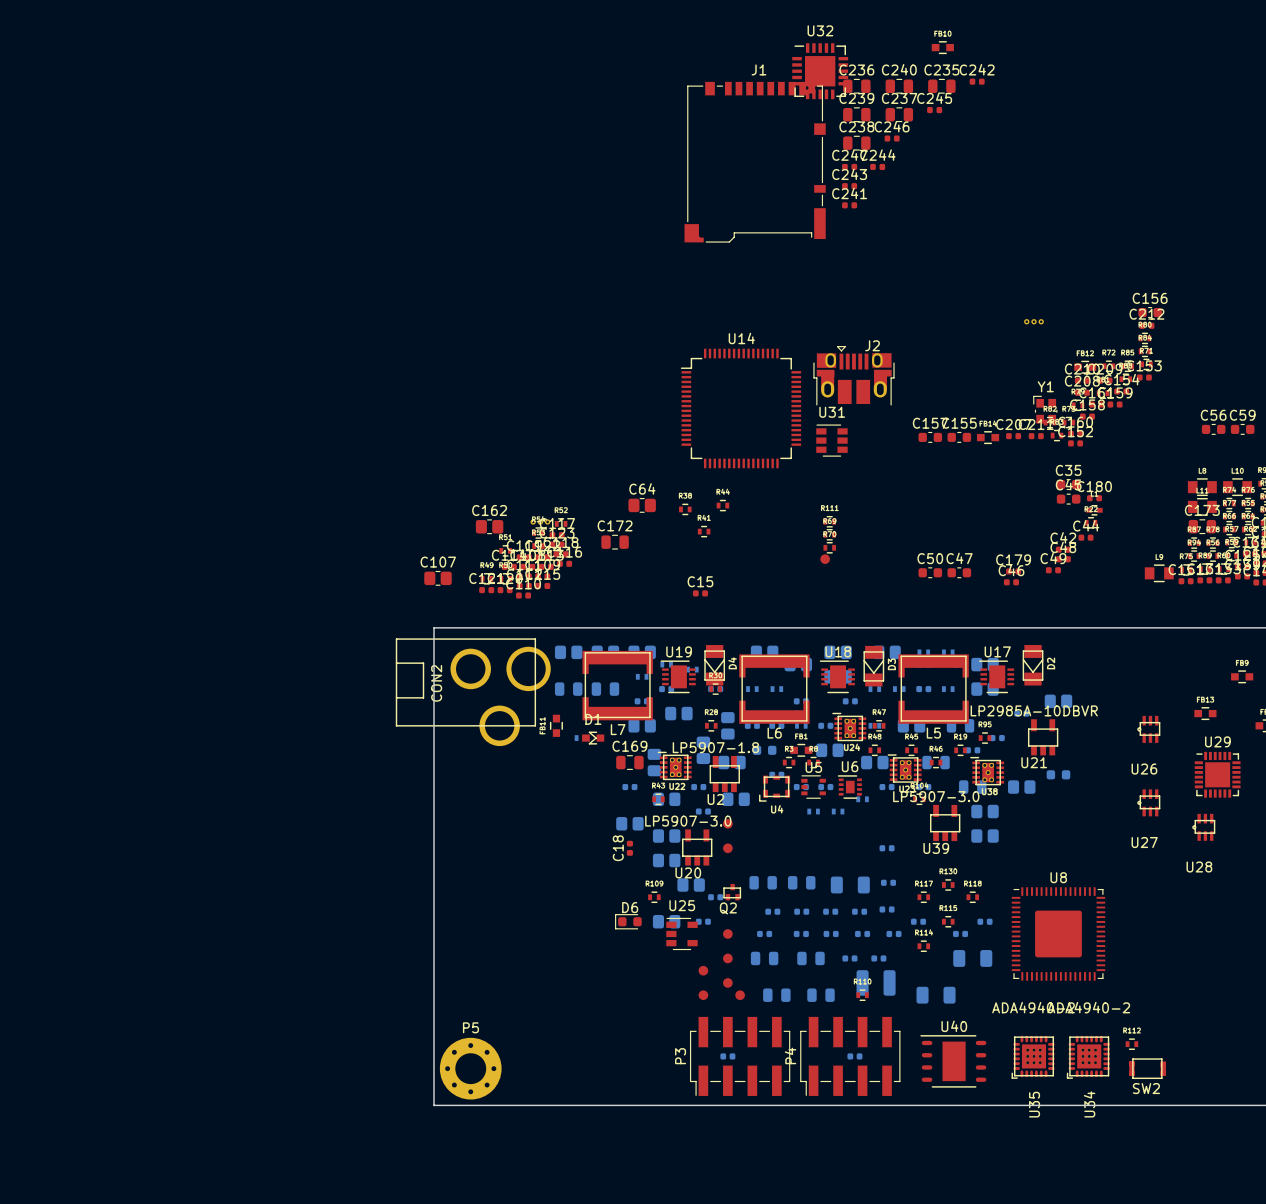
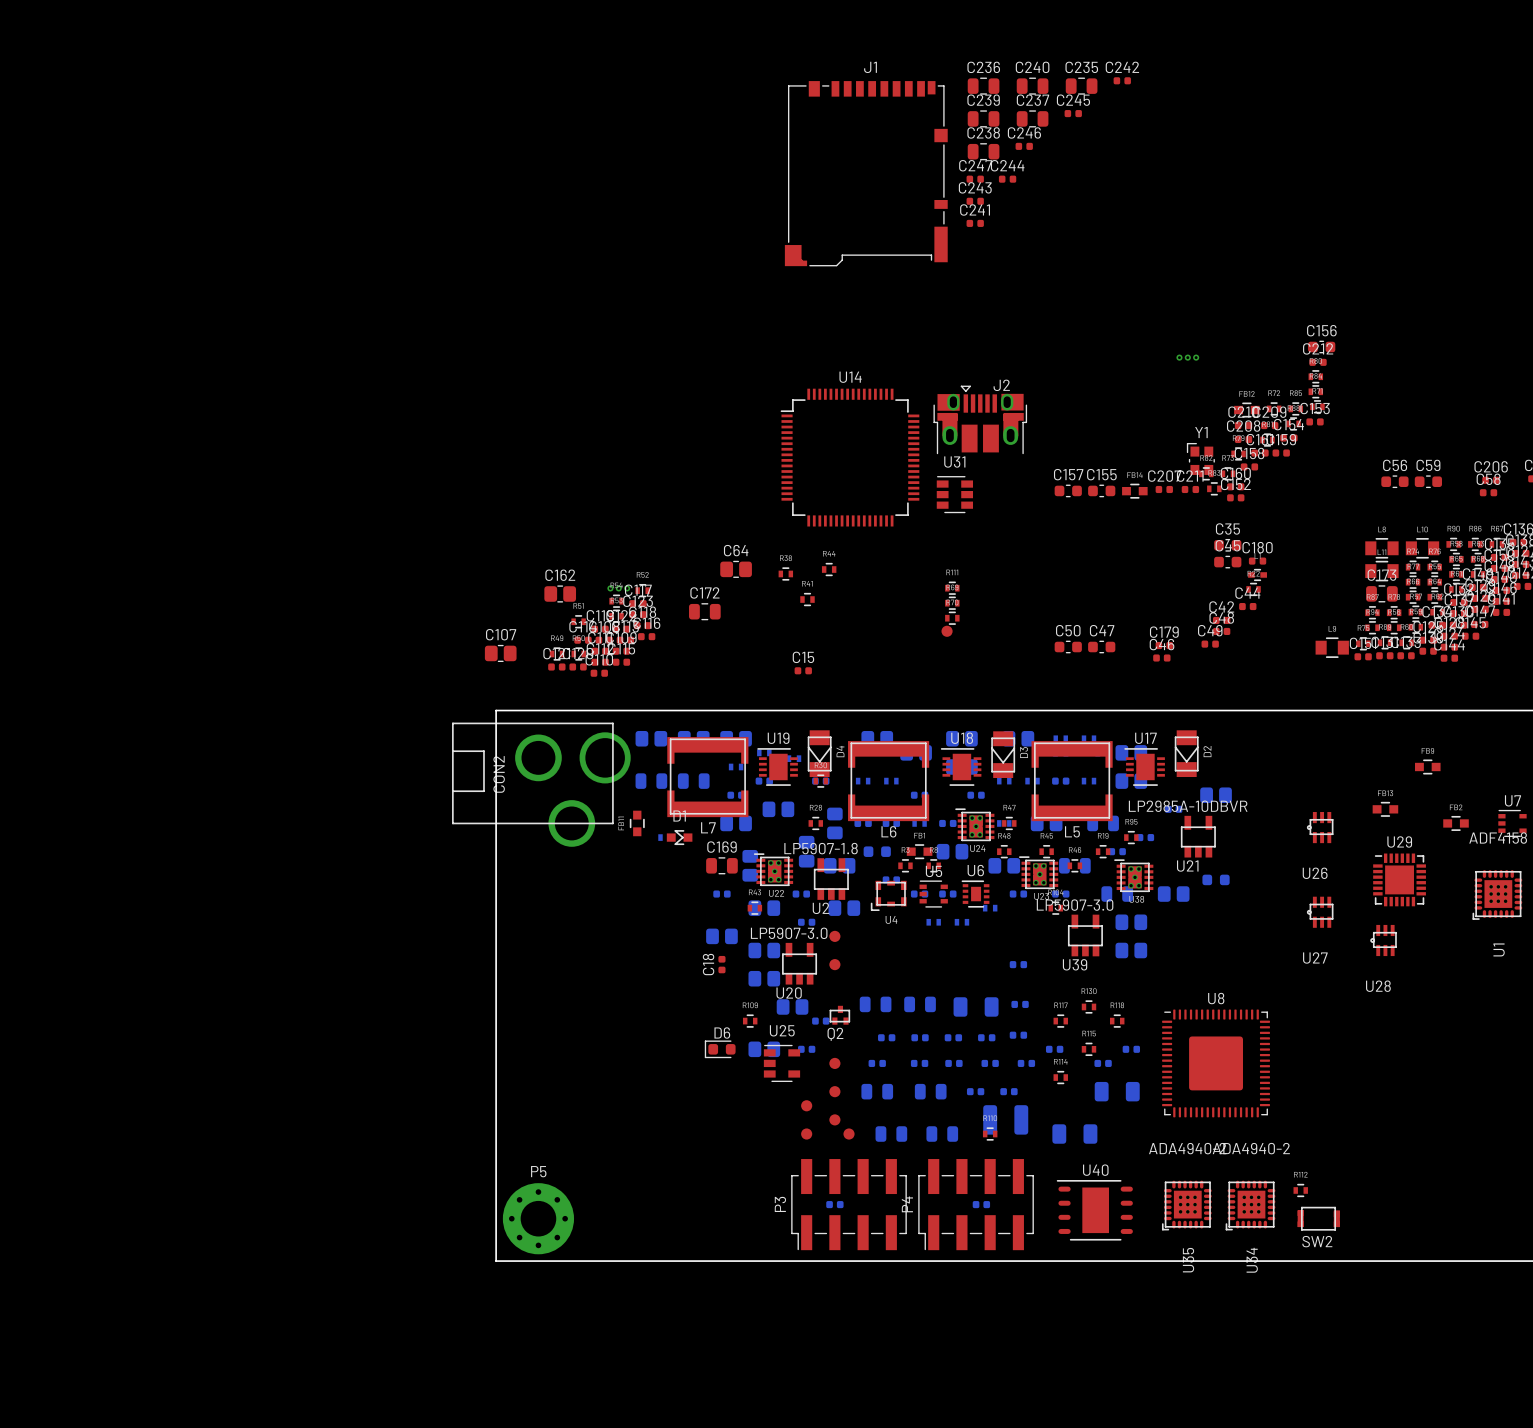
part: (942, 47) -> none
U32: (820, 71) -> none

